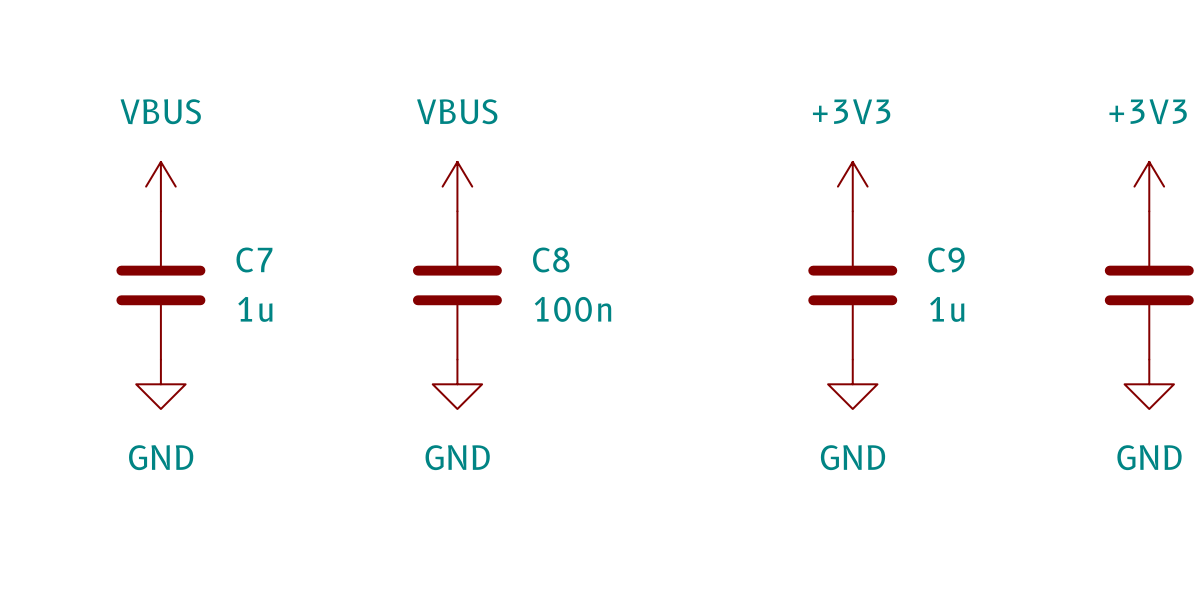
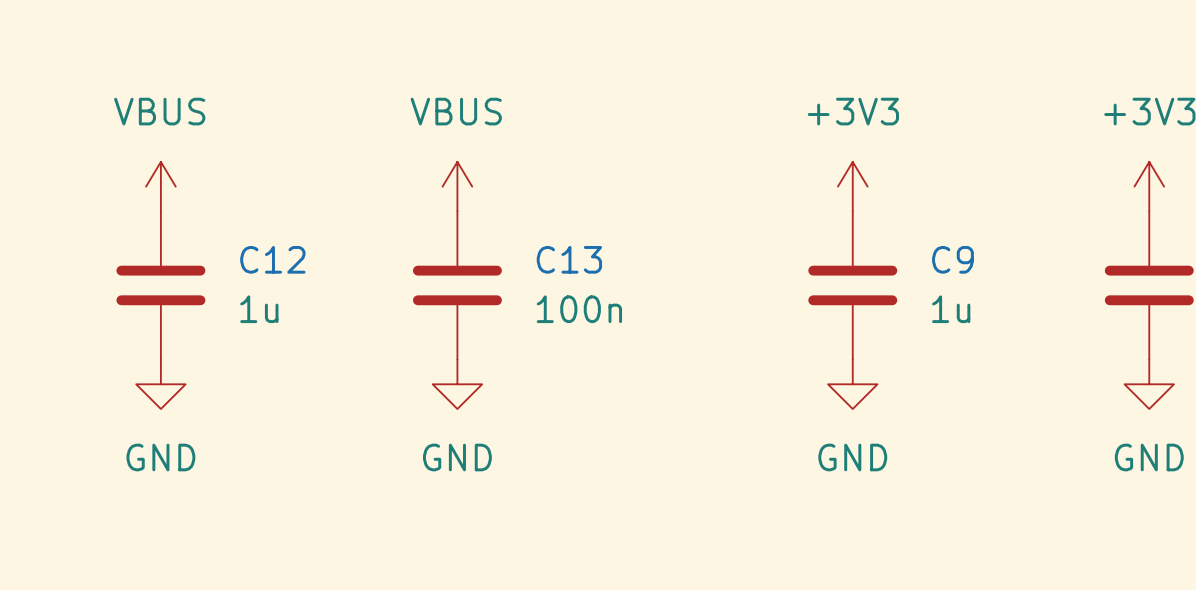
C7 name: C7 (254, 259) -> C12 (272, 259)
C8 name: C8 (551, 259) -> C13 (569, 259)

